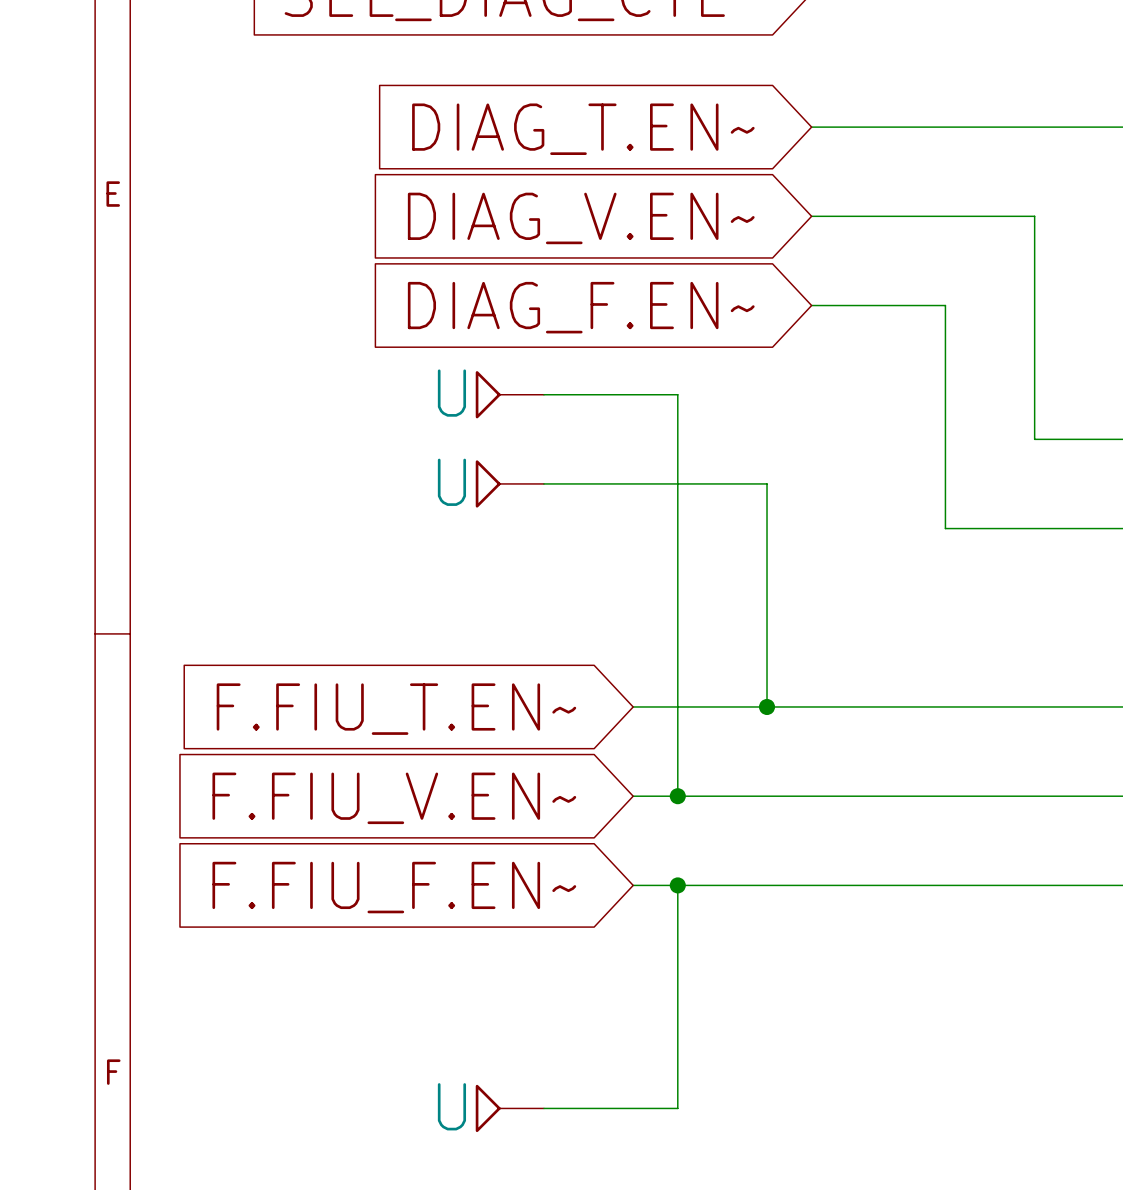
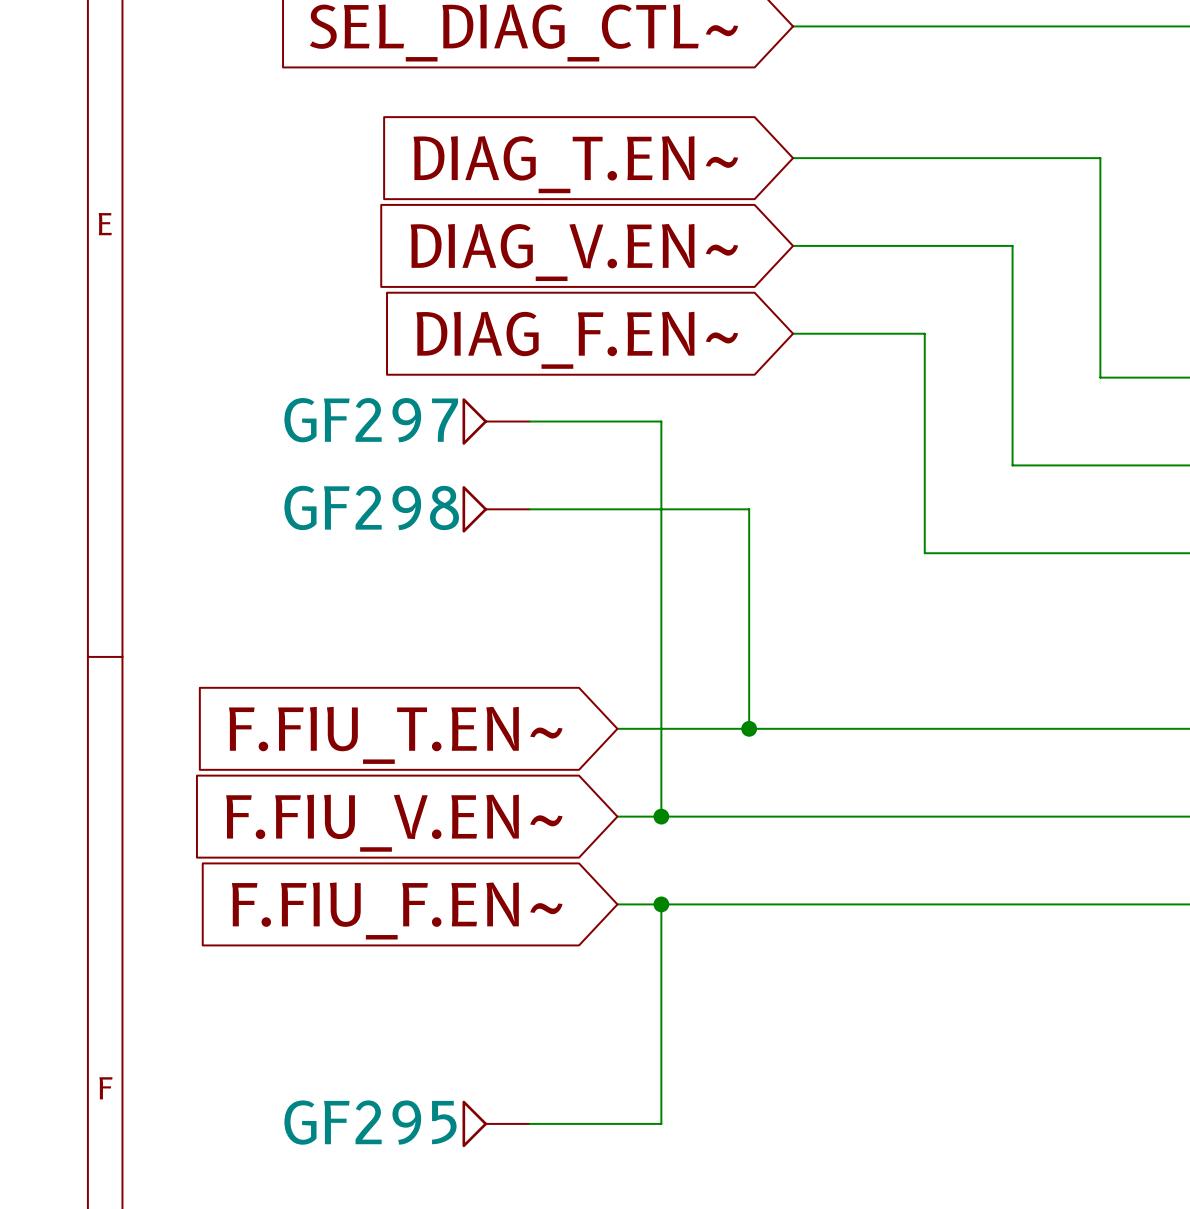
U name: U (451, 393) -> GF297 (371, 420)
U name: U (451, 482) -> GF298 (371, 507)
U name: U (451, 1106) -> GF295 (370, 1122)

